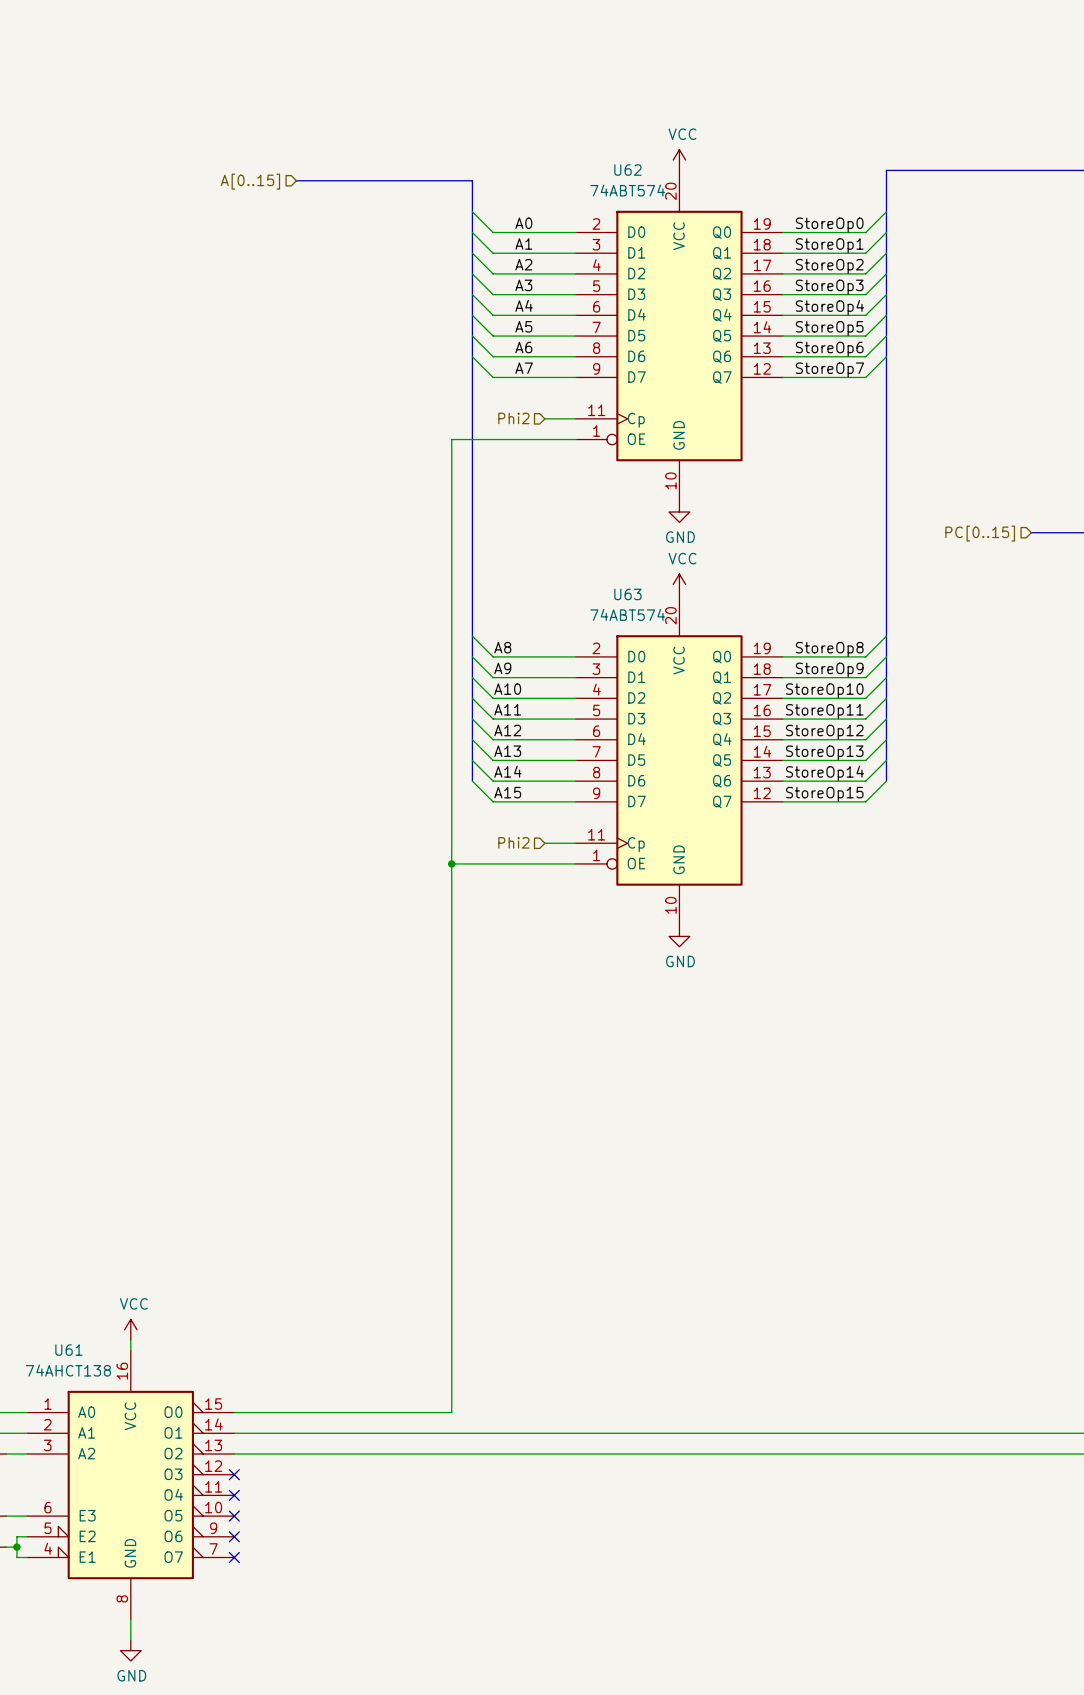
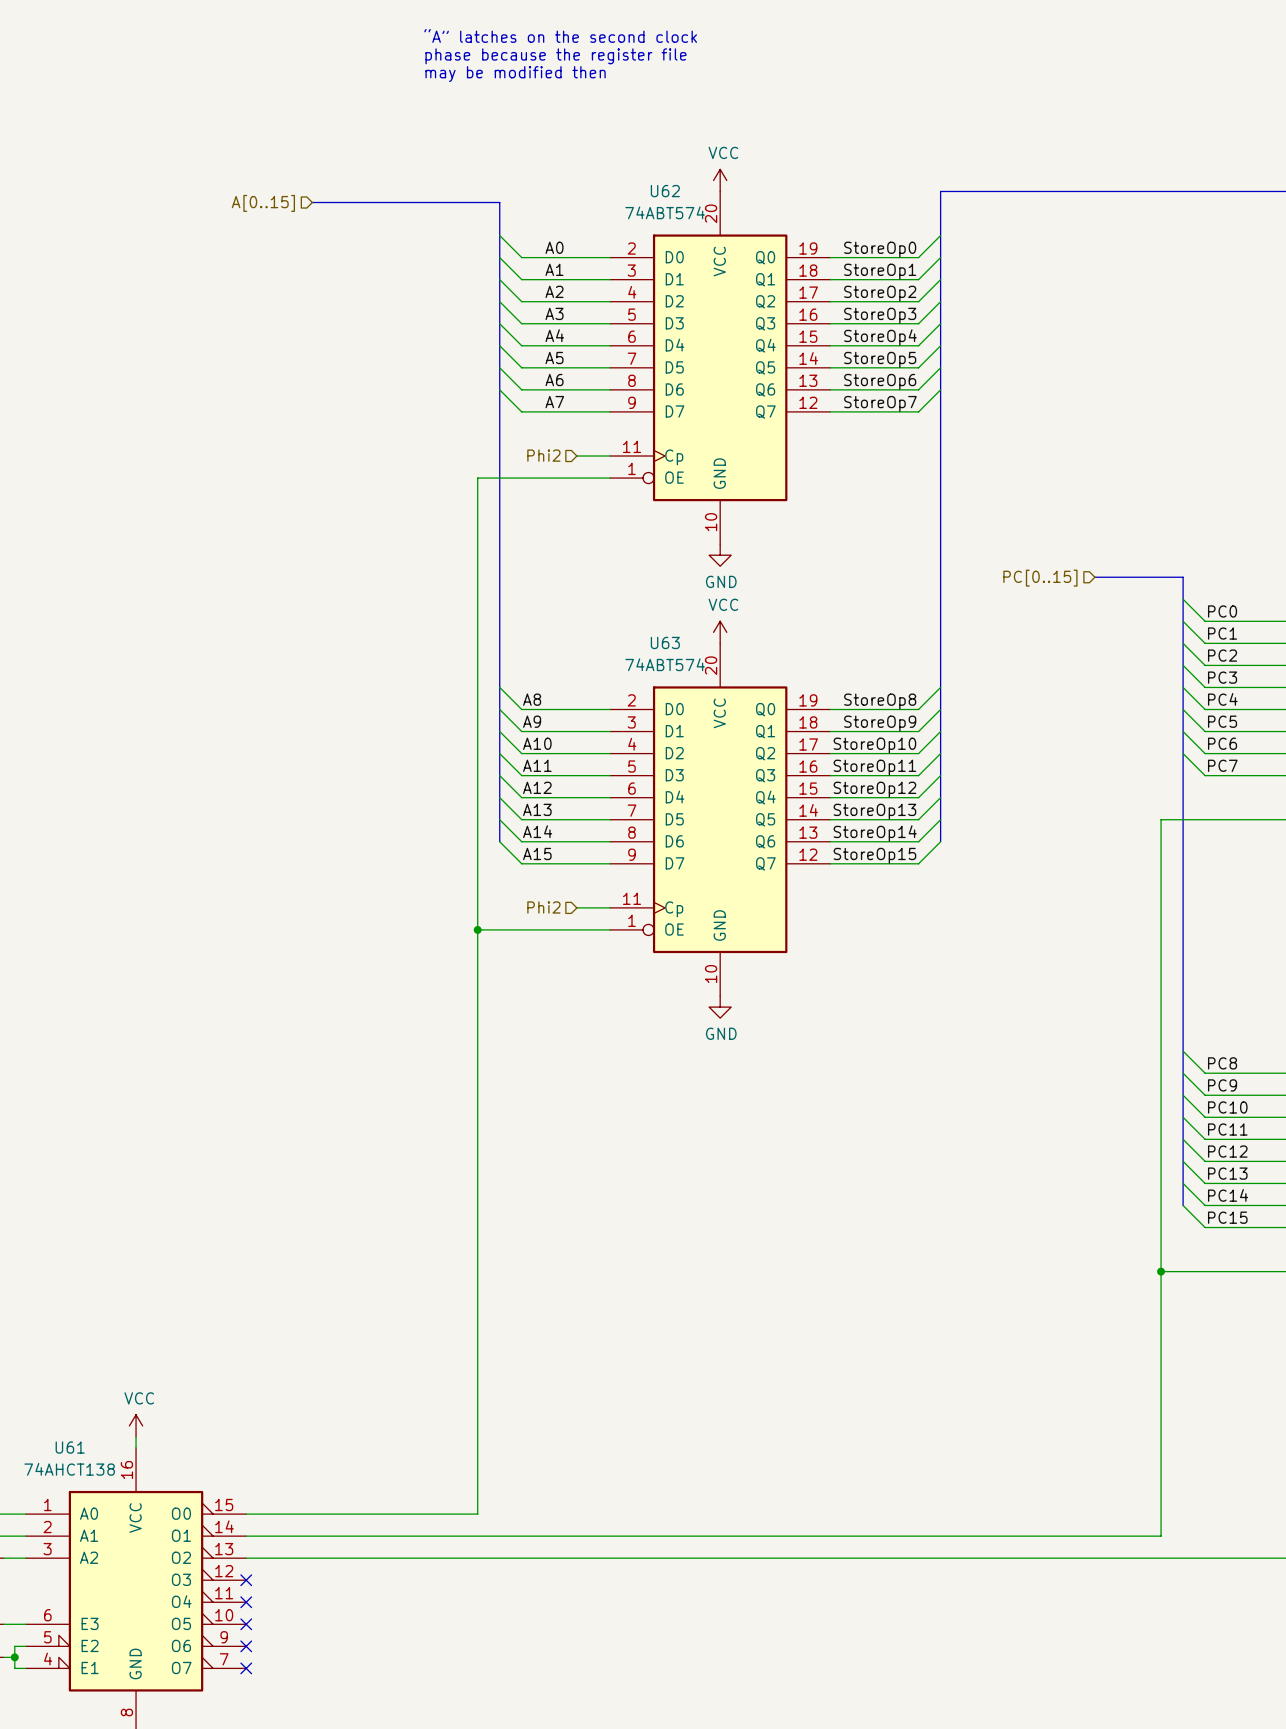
text: none -> “A” latches on the second clock (560, 35)
text: none -> phase because the register file (555, 56)
text: none -> may be modified then (515, 74)

